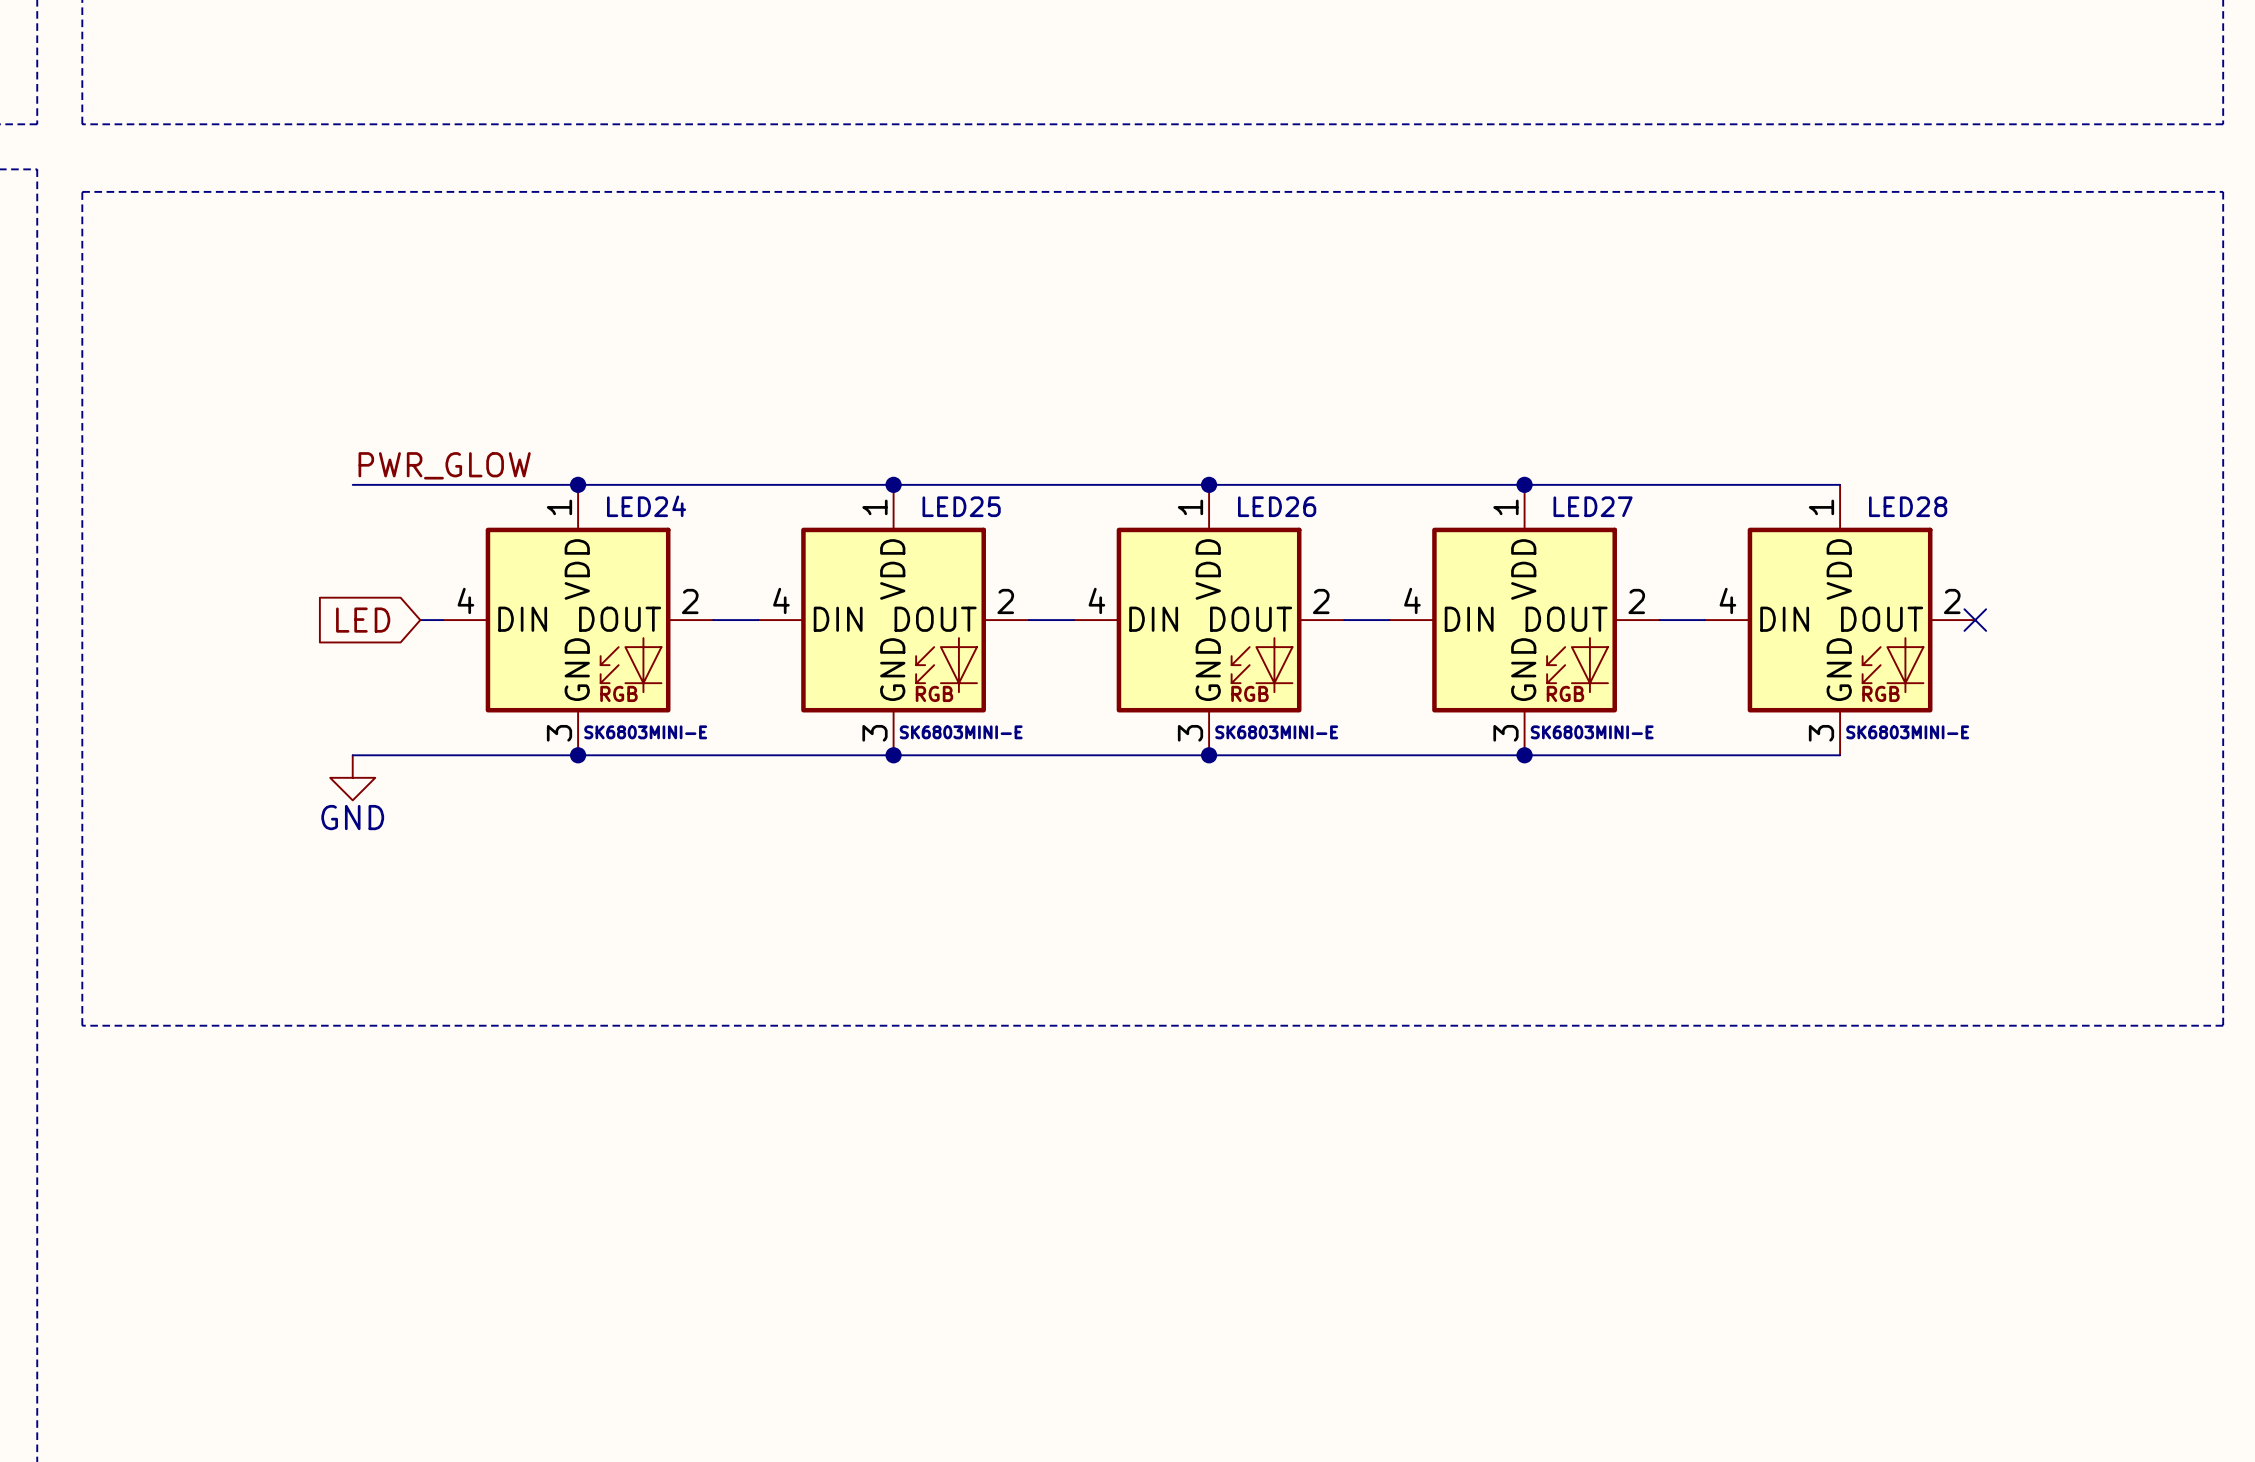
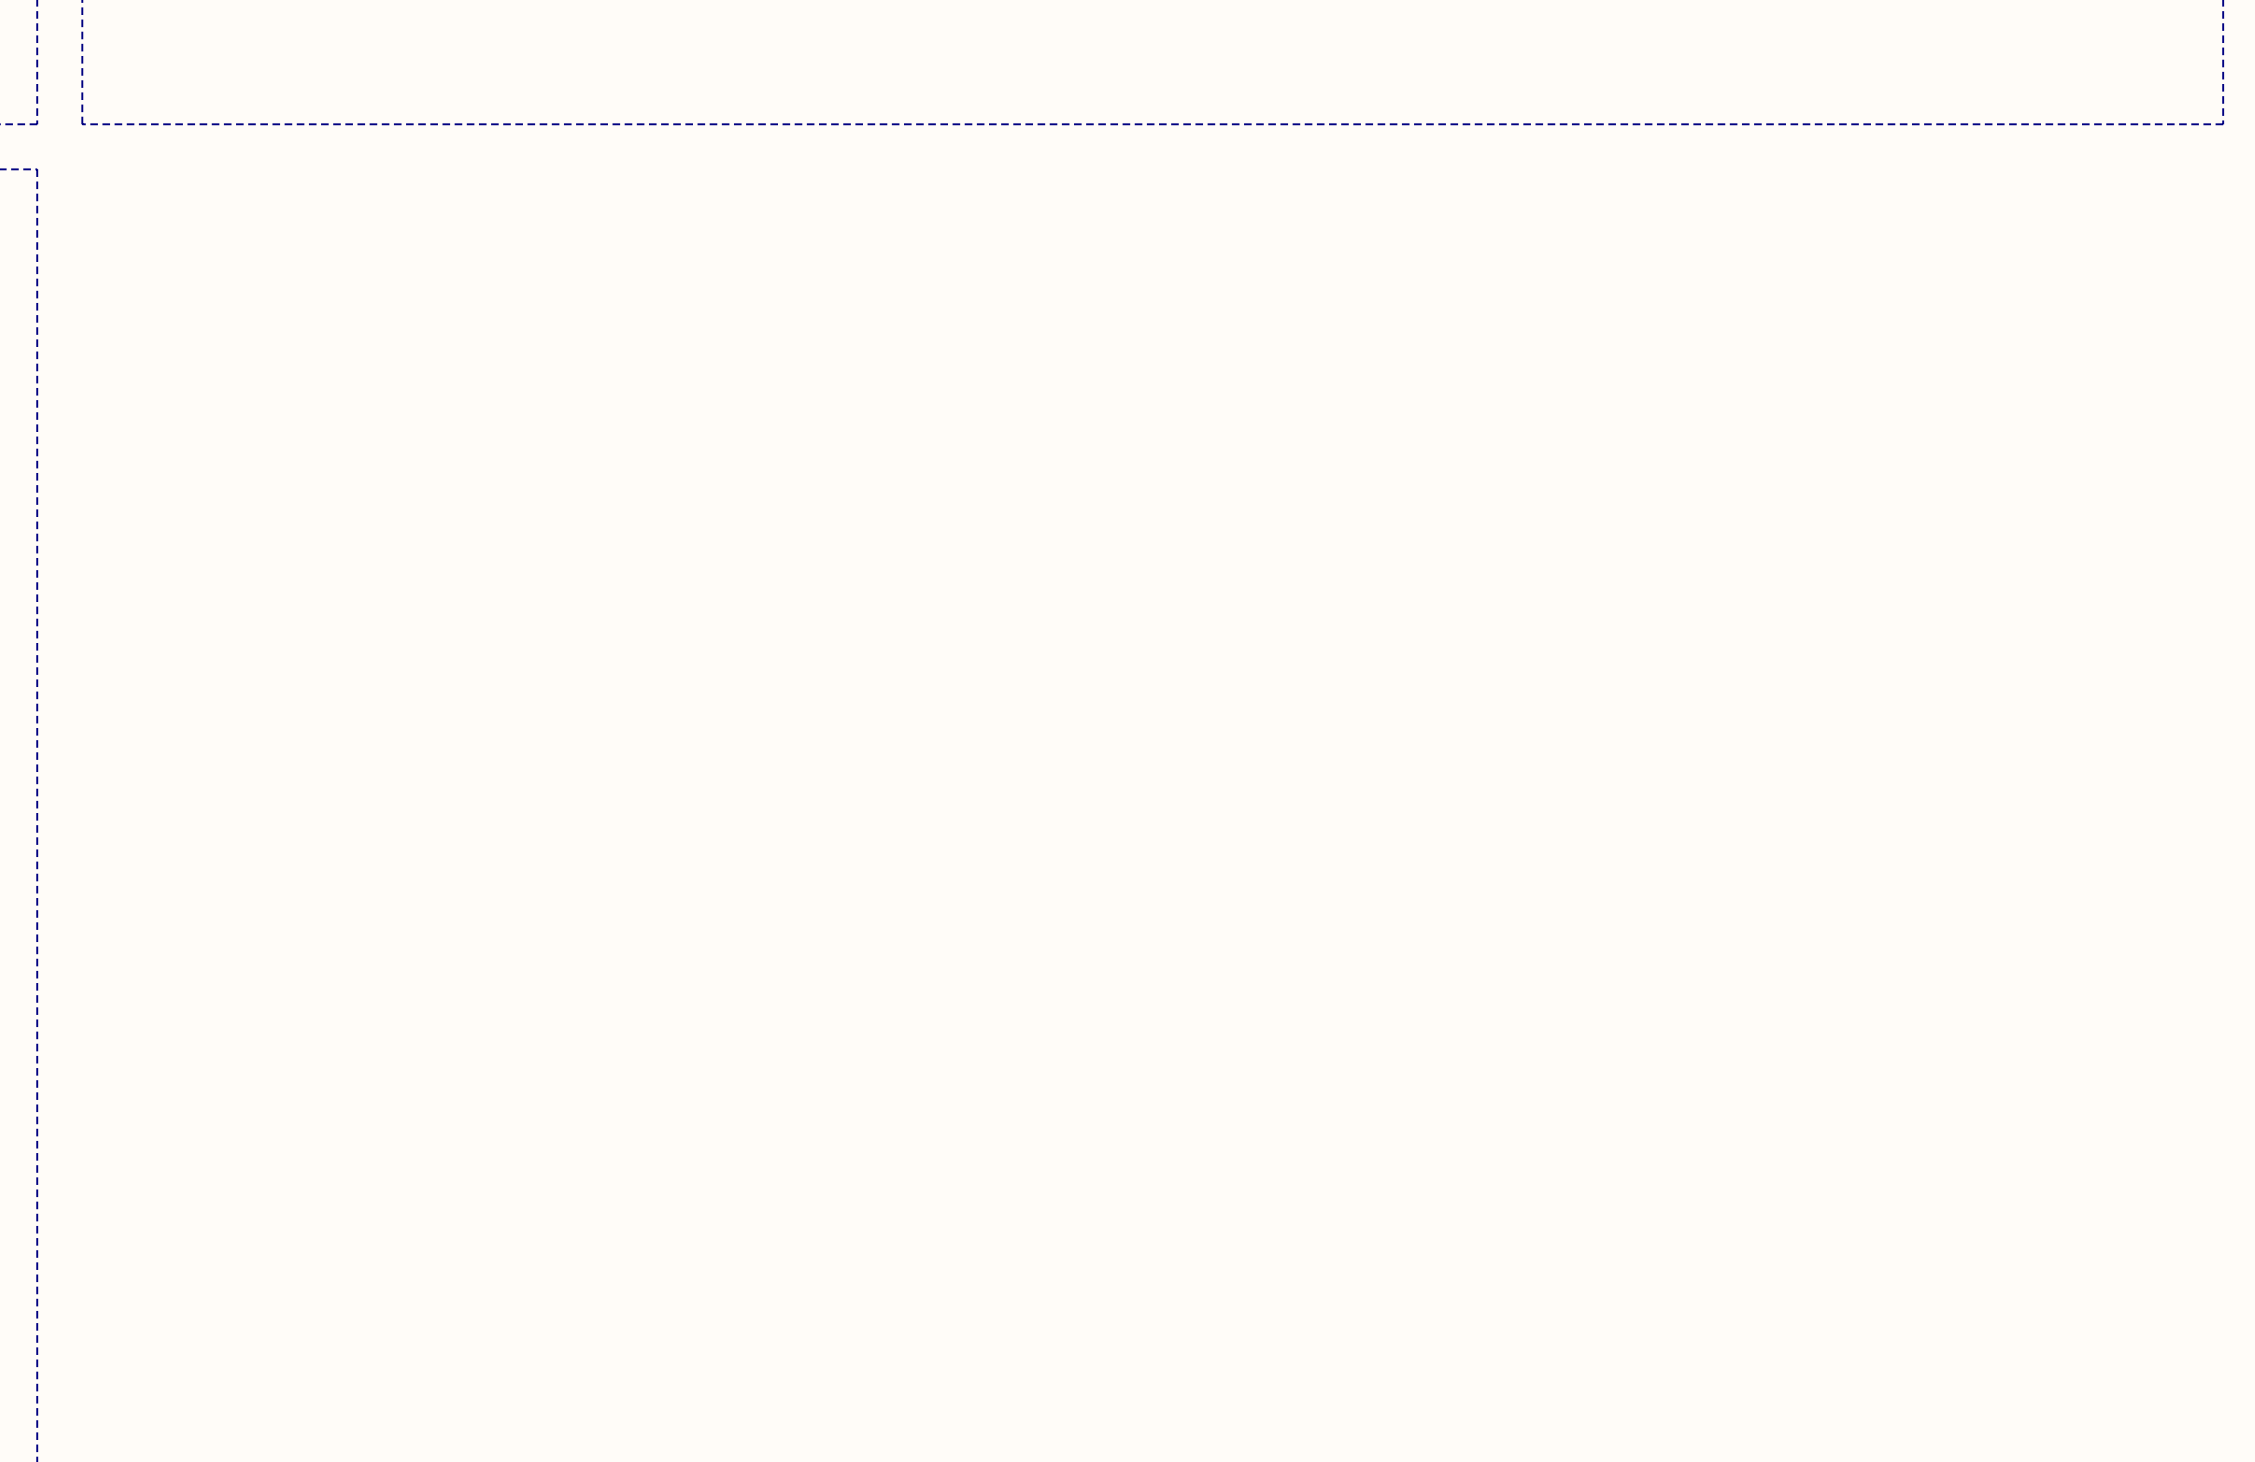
line: (82, 191) (2223, 191) (2223, 1025) (82, 1025) (82, 191) -> none
label: PWR_GLOW (444, 465) -> none
wire: (352, 484) (1840, 484) -> none
junction: (578, 484) -> none
junction: (893, 484) -> none
junction: (1209, 484) -> none
junction: (1524, 484) -> none
global label: LED (363, 620) -> none
wire: (420, 620) (442, 620) -> none
LED24: SK6803MINI-E (578, 620) -> none
wire: (713, 620) (758, 620) -> none
LED25: SK6803MINI-E (893, 620) -> none
wire: (1028, 620) (1073, 620) -> none
LED26: SK6803MINI-E (1209, 620) -> none
wire: (1344, 620) (1389, 620) -> none
LED27: SK6803MINI-E (1524, 620) -> none
wire: (1659, 620) (1704, 620) -> none
LED28: SK6803MINI-E (1840, 620) -> none
no-connect mark: (1975, 620) -> none
wire: (352, 755) (1840, 755) -> none
junction: (578, 755) -> none
junction: (893, 755) -> none
junction: (1209, 755) -> none
junction: (1524, 755) -> none
power symbol: GND (352, 777) -> none

